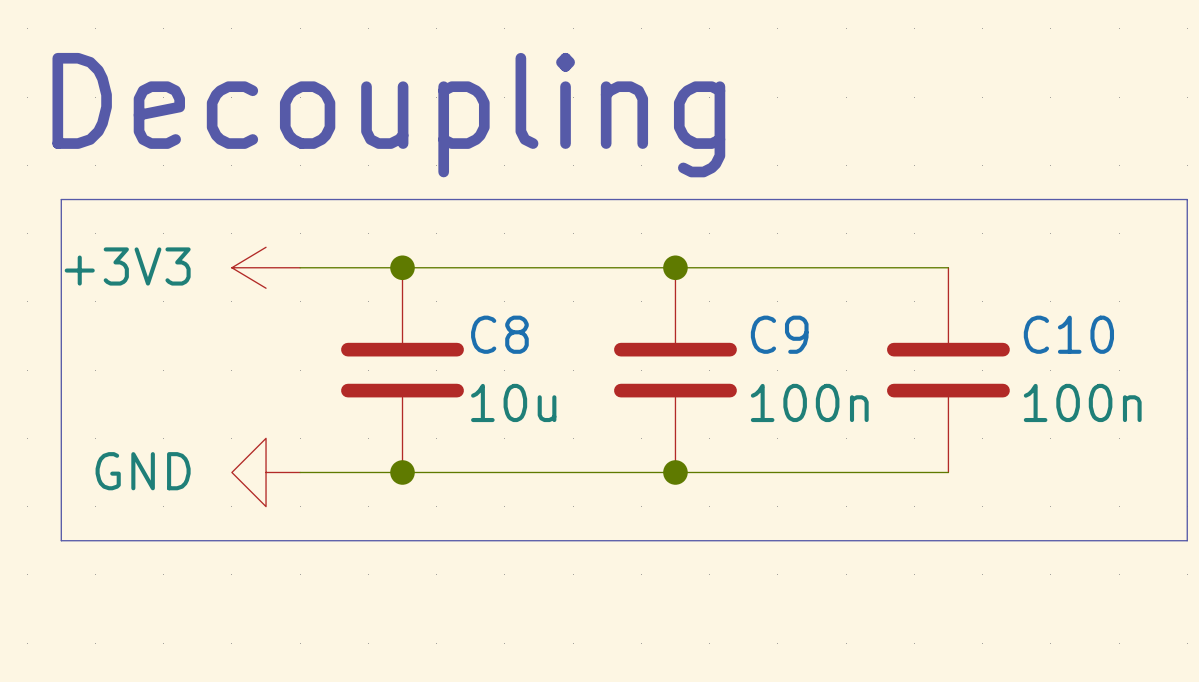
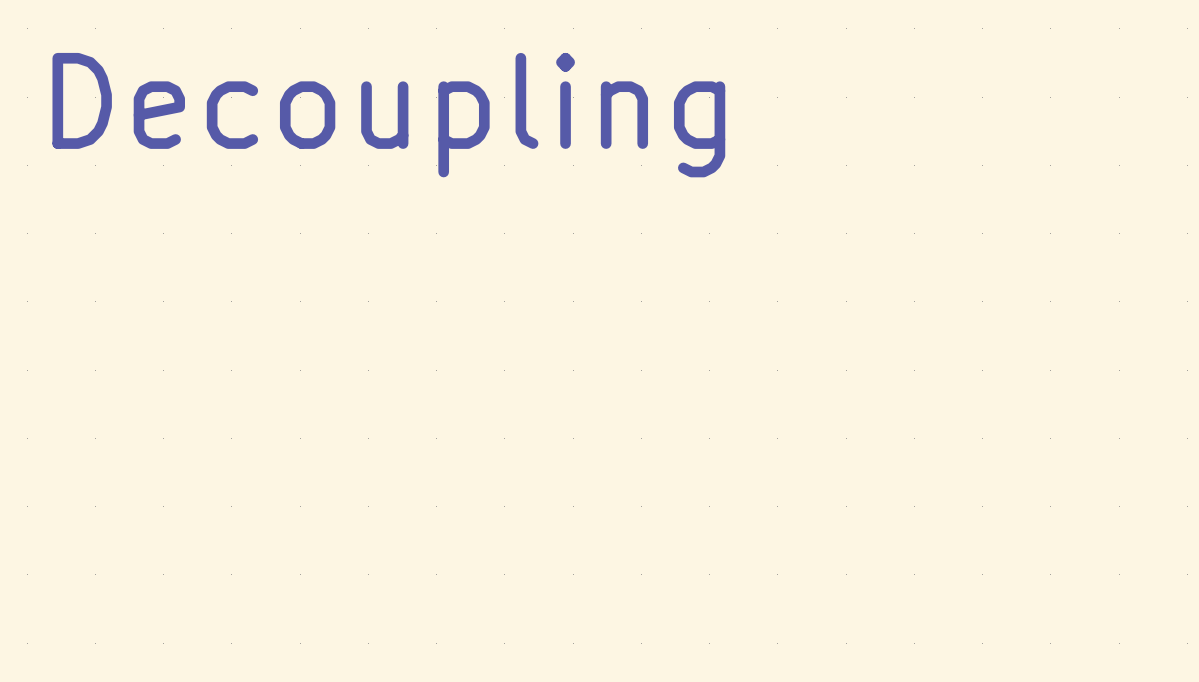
line: (61, 199) (1187, 199) (1187, 540) (61, 540) (61, 199) -> none
power symbol: +3V3 (266, 267) -> none
wire: (300, 267) (948, 267) -> none
junction: (402, 267) -> none
junction: (675, 267) -> none
C8: 10u (402, 370) -> none
C9: 100n (675, 370) -> none
C10: 100n (948, 370) -> none
power symbol: GND (266, 472) -> none
wire: (300, 472) (948, 472) -> none
junction: (402, 472) -> none
junction: (675, 472) -> none

